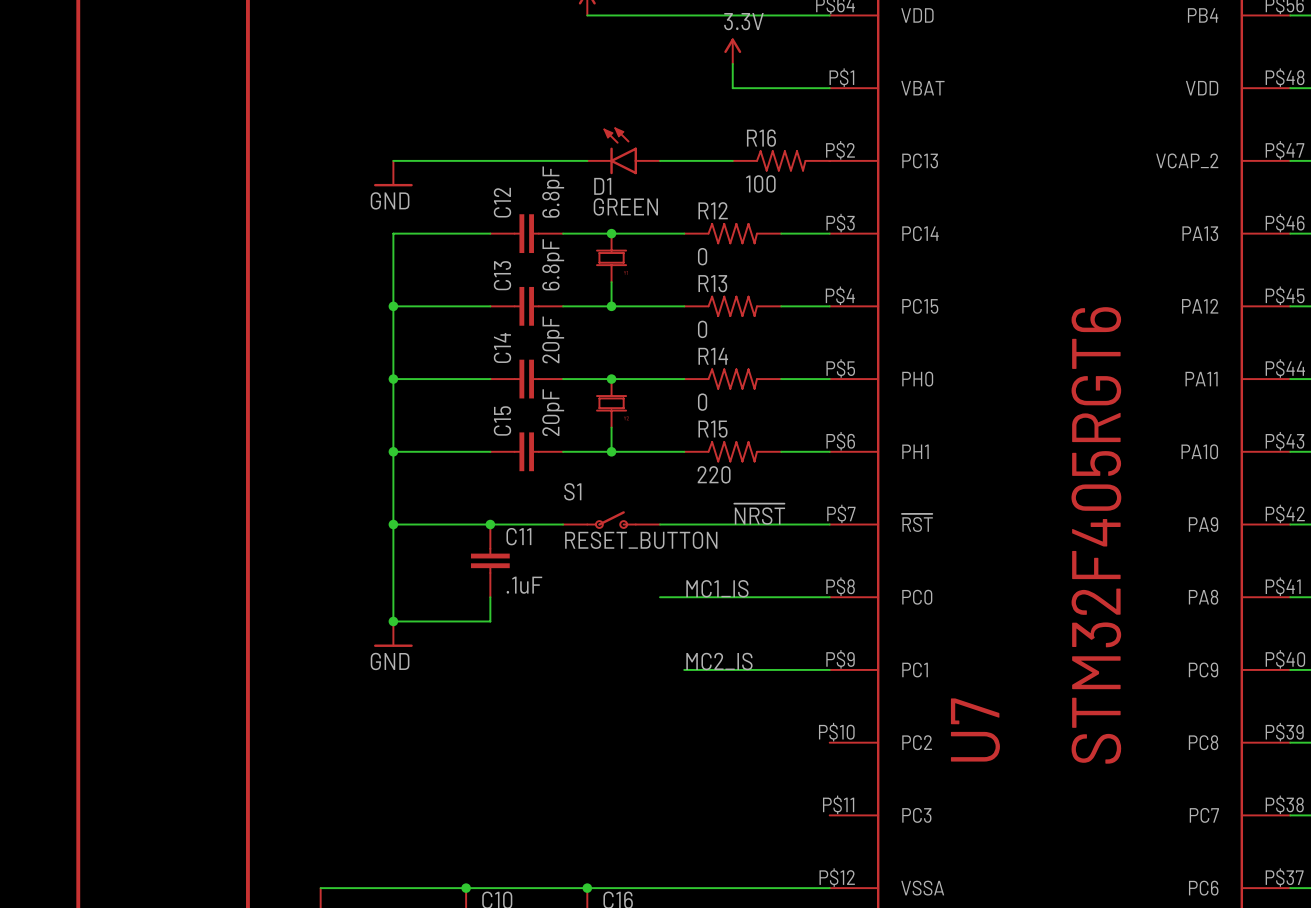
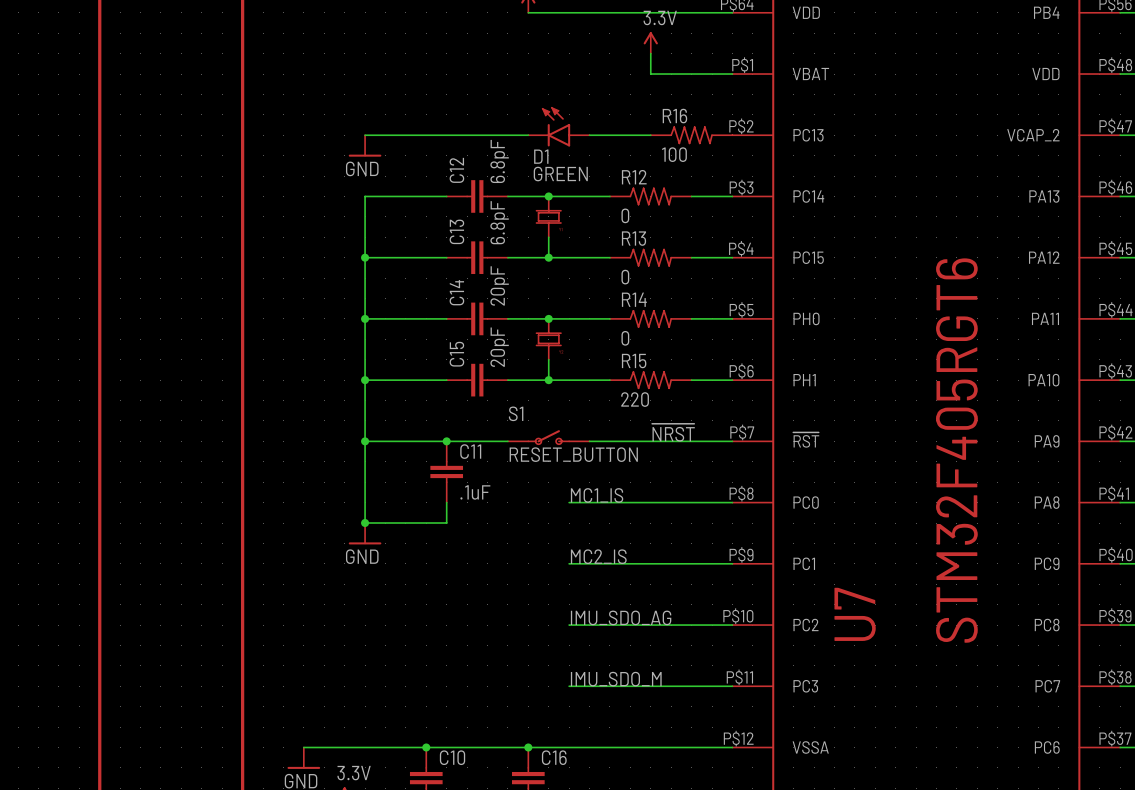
label position: MC1_IS (717, 588) -> MC1_IS (597, 495)
wire: none -> (569, 502) (589, 502)
label position: MC2_IS (719, 661) -> MC2_IS (598, 556)
wire: none -> (569, 563) (609, 563)
label: none -> IMU_SDO_AG (621, 617)
wire: none -> (569, 625) (732, 625)
label: none -> IMU_SDO_M (616, 679)
wire: none -> (569, 686) (732, 686)

